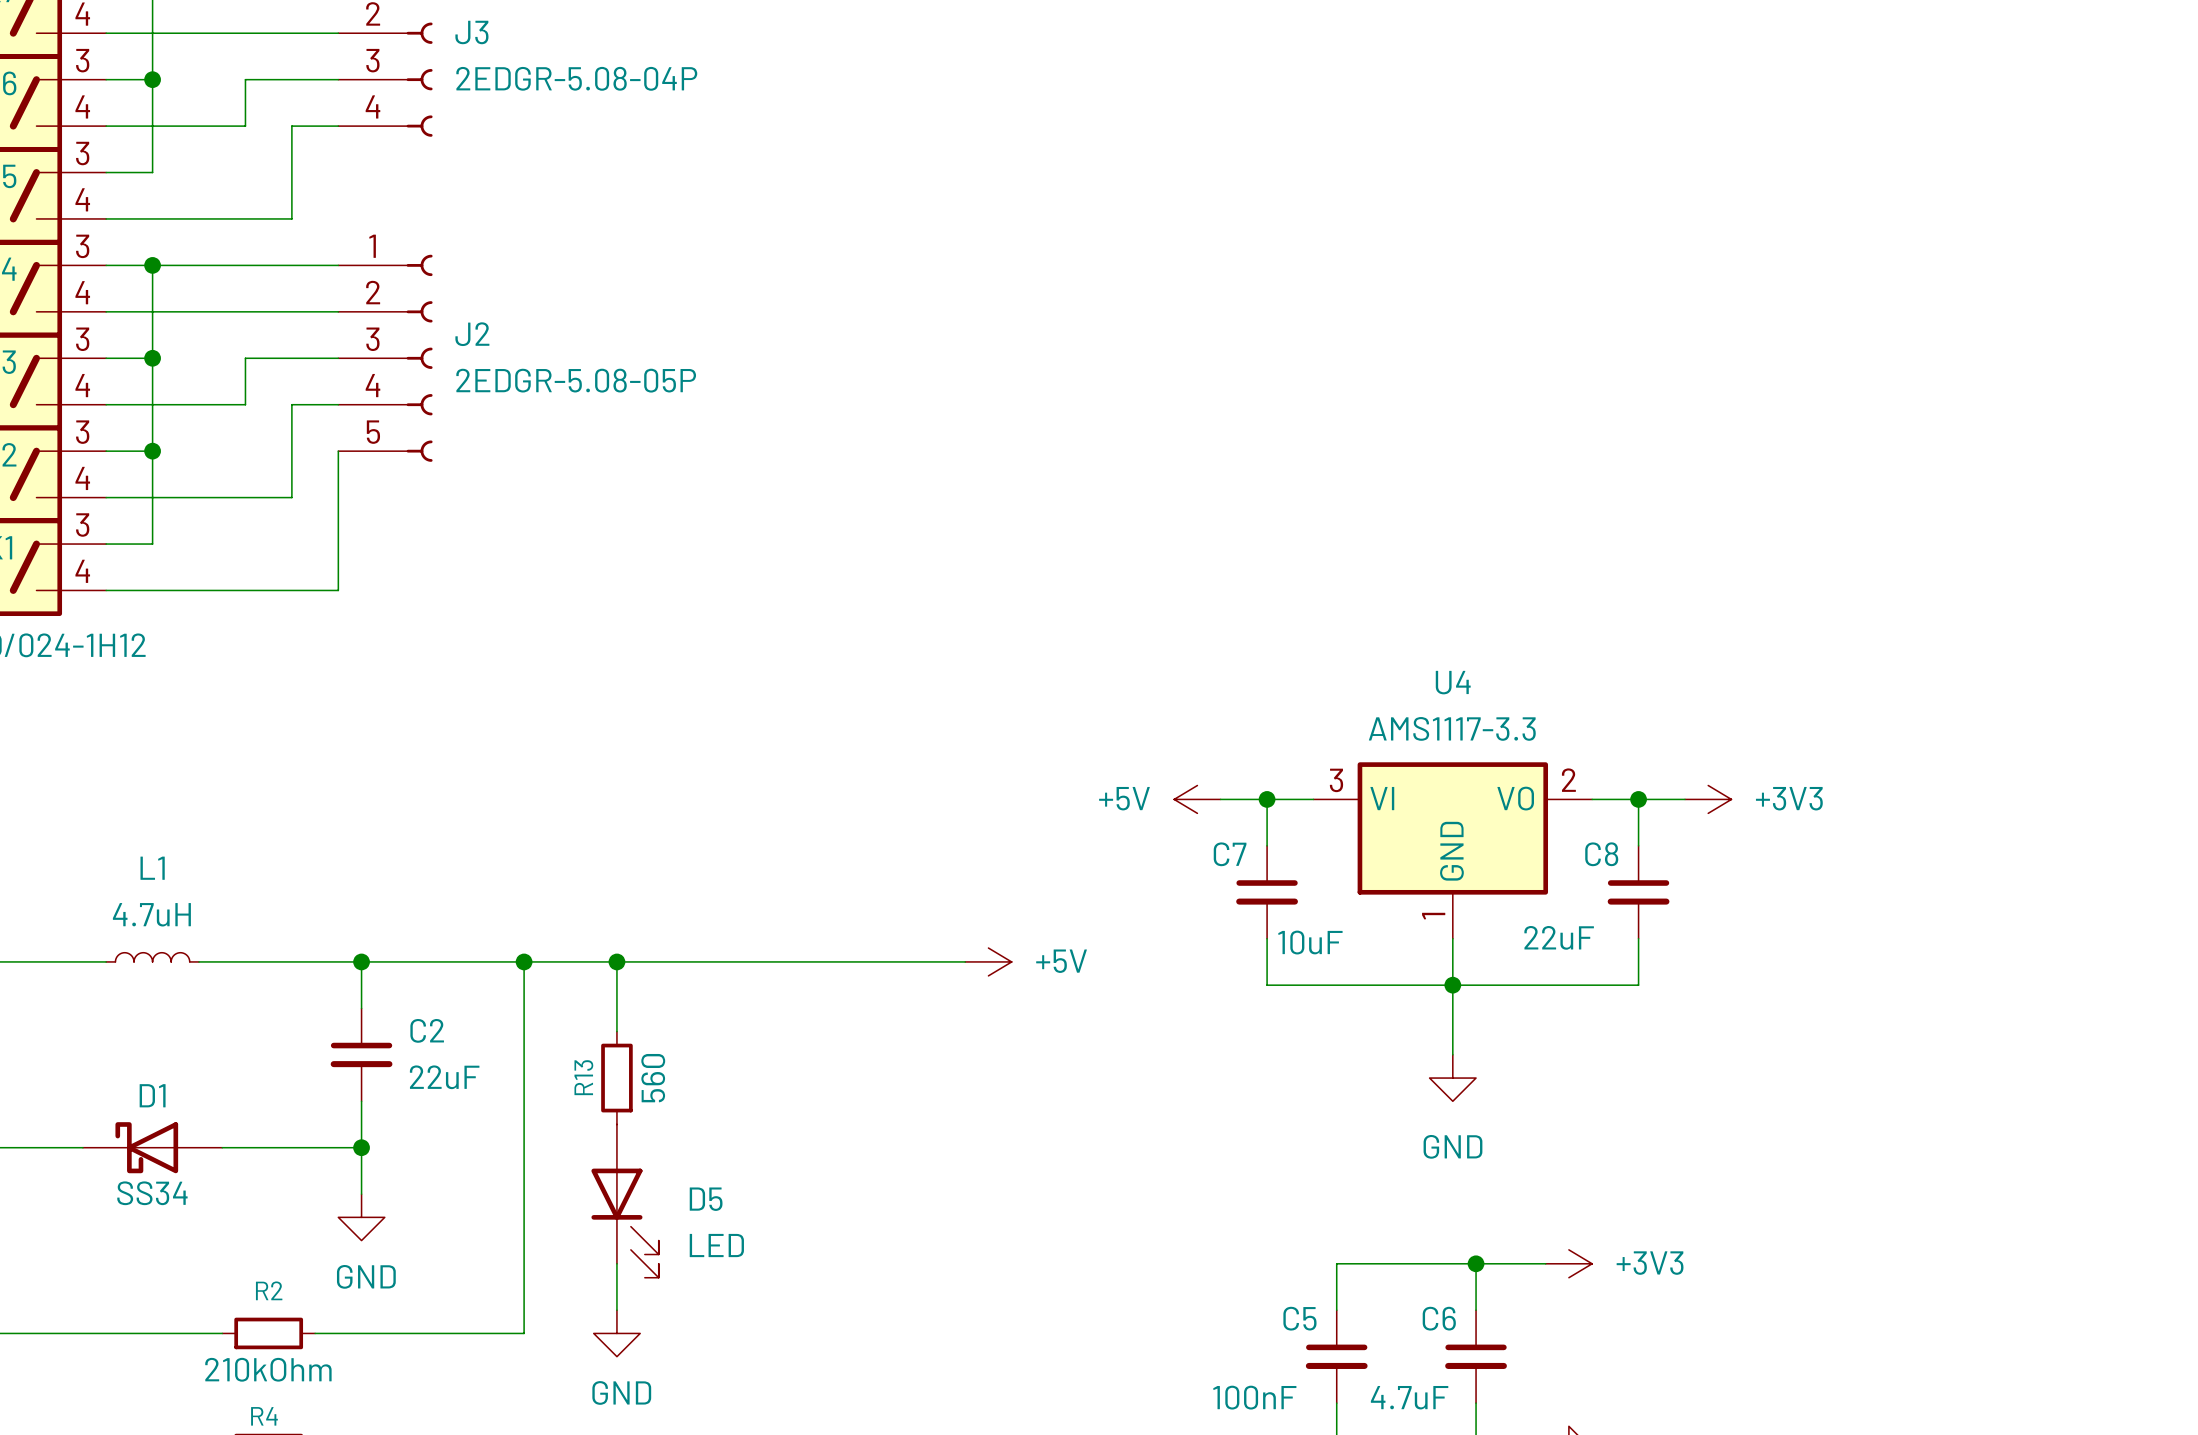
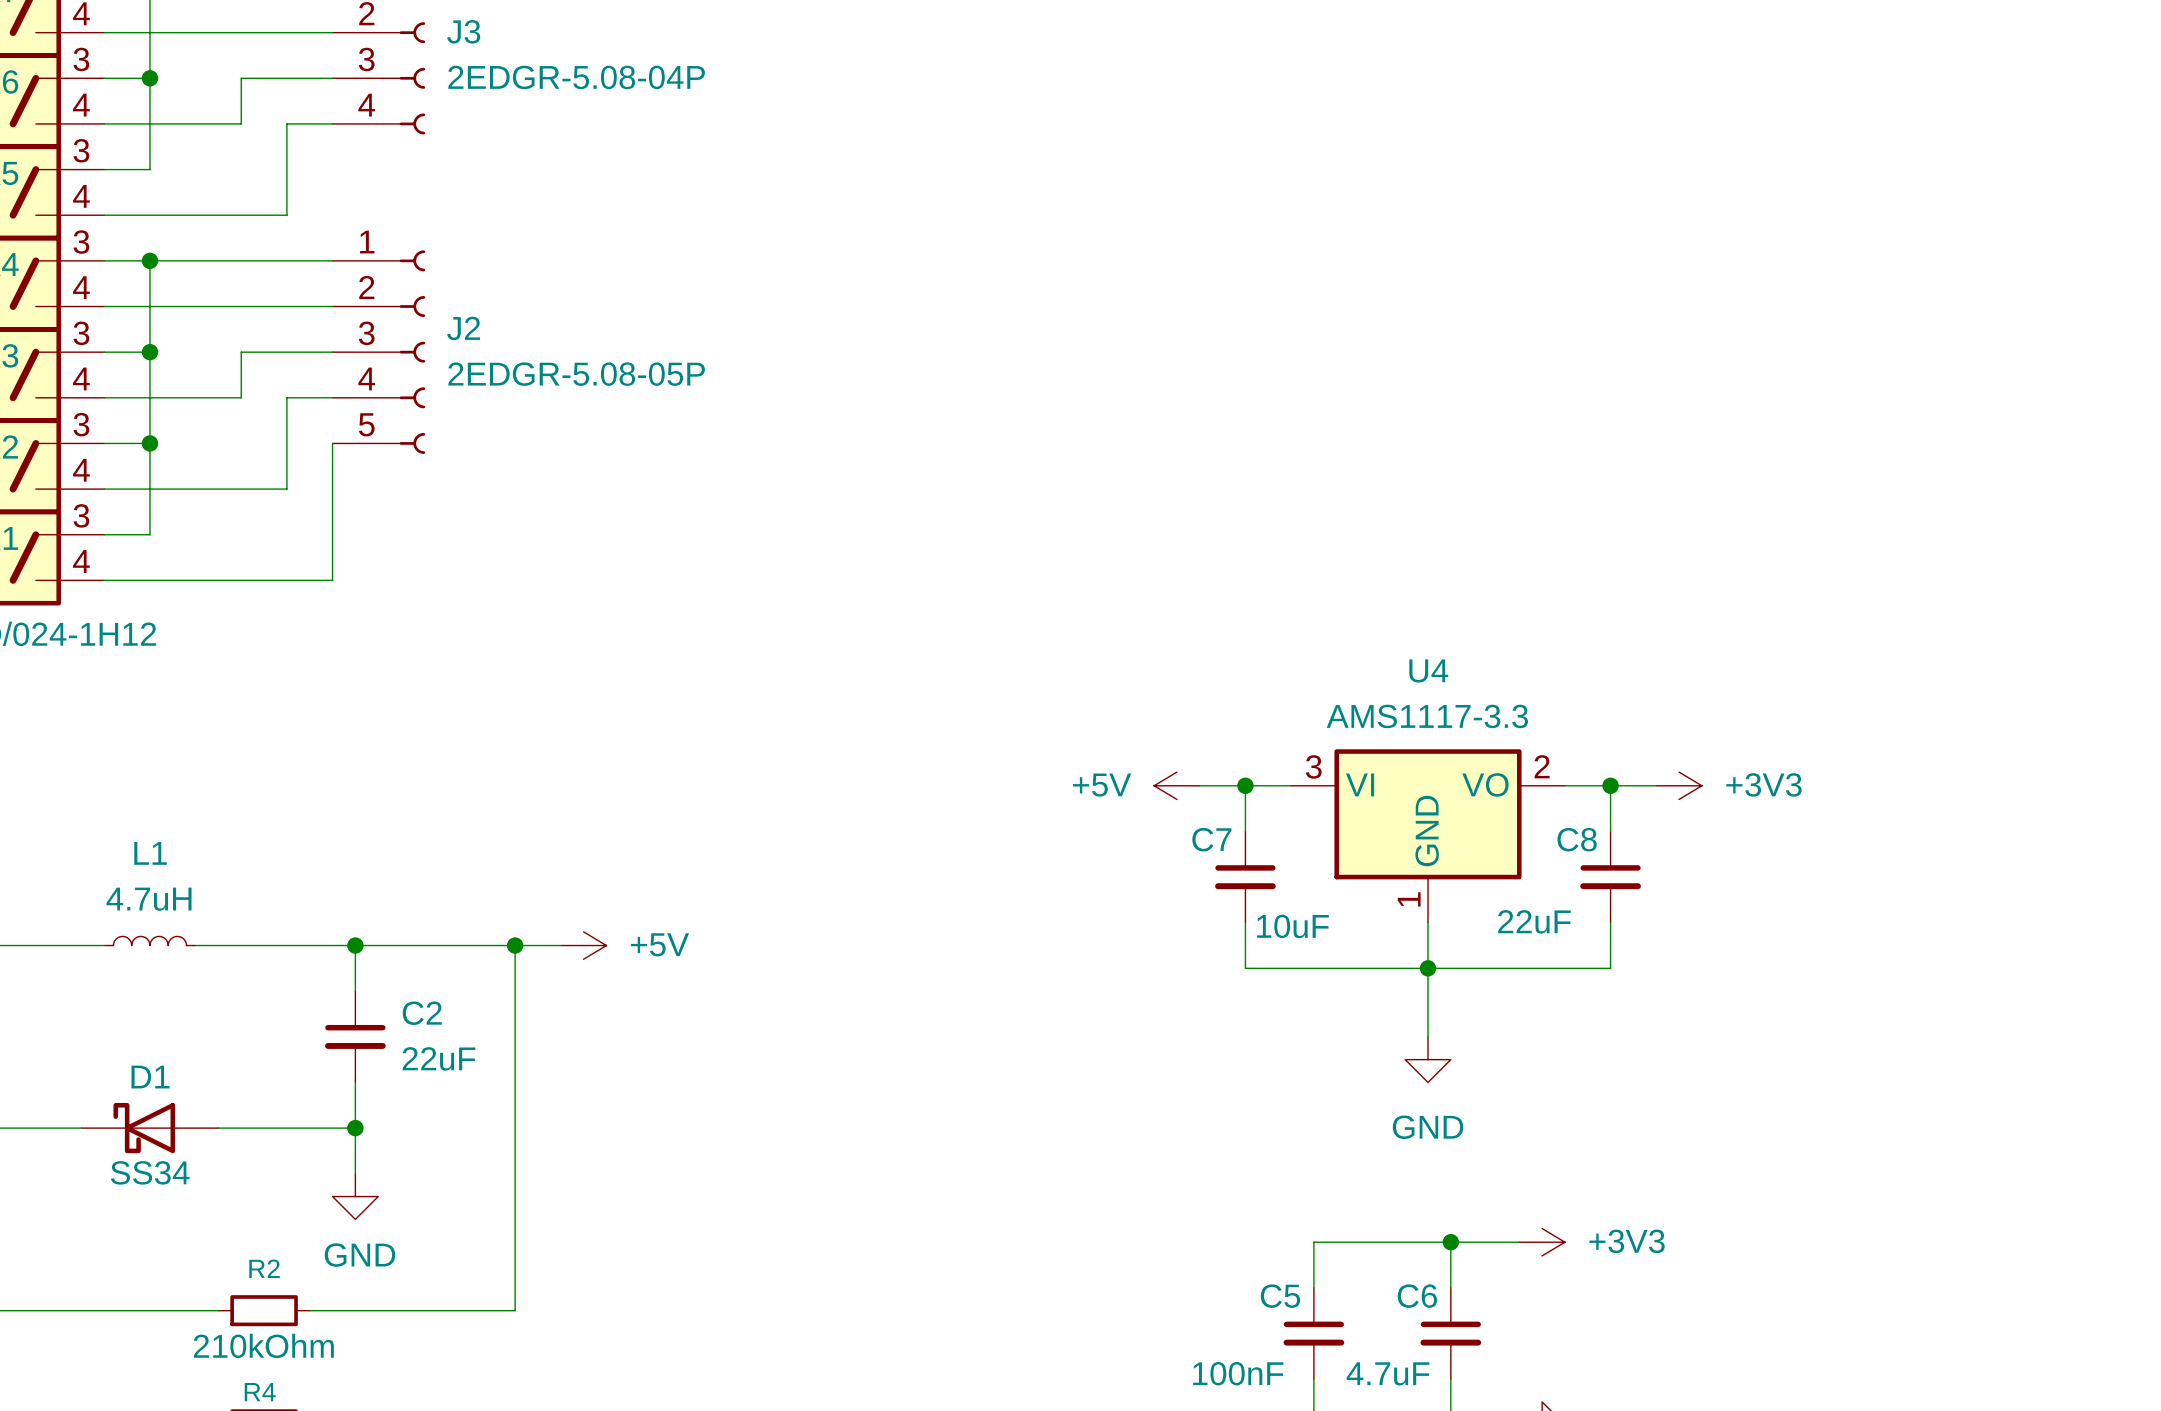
wire: (570, 961) (965, 961) -> none
wire: (616, 961) (616, 1031) -> none
junction: (616, 961) -> none
power symbol position: +5V (988, 961) -> +5V (583, 945)
R13: 560 (616, 1078) -> none
D5: LED (625, 1201) -> none
wire: (616, 1263) (616, 1310) -> none
power symbol: GND (616, 1333) -> none

